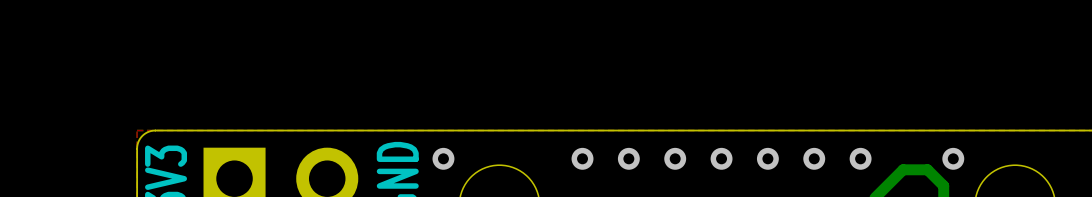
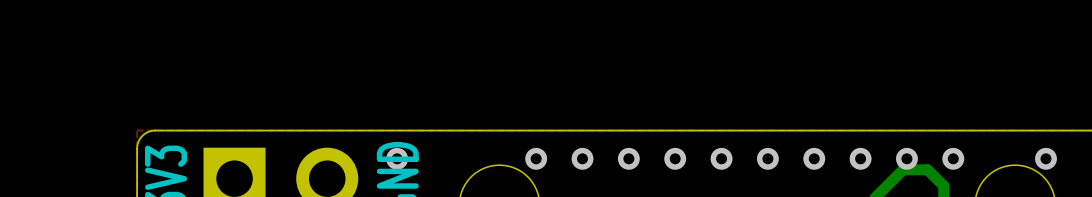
via: none -> (397, 158)
via: (443, 158) -> none
via: none -> (536, 158)
via: none -> (906, 158)
via: none -> (1045, 158)

